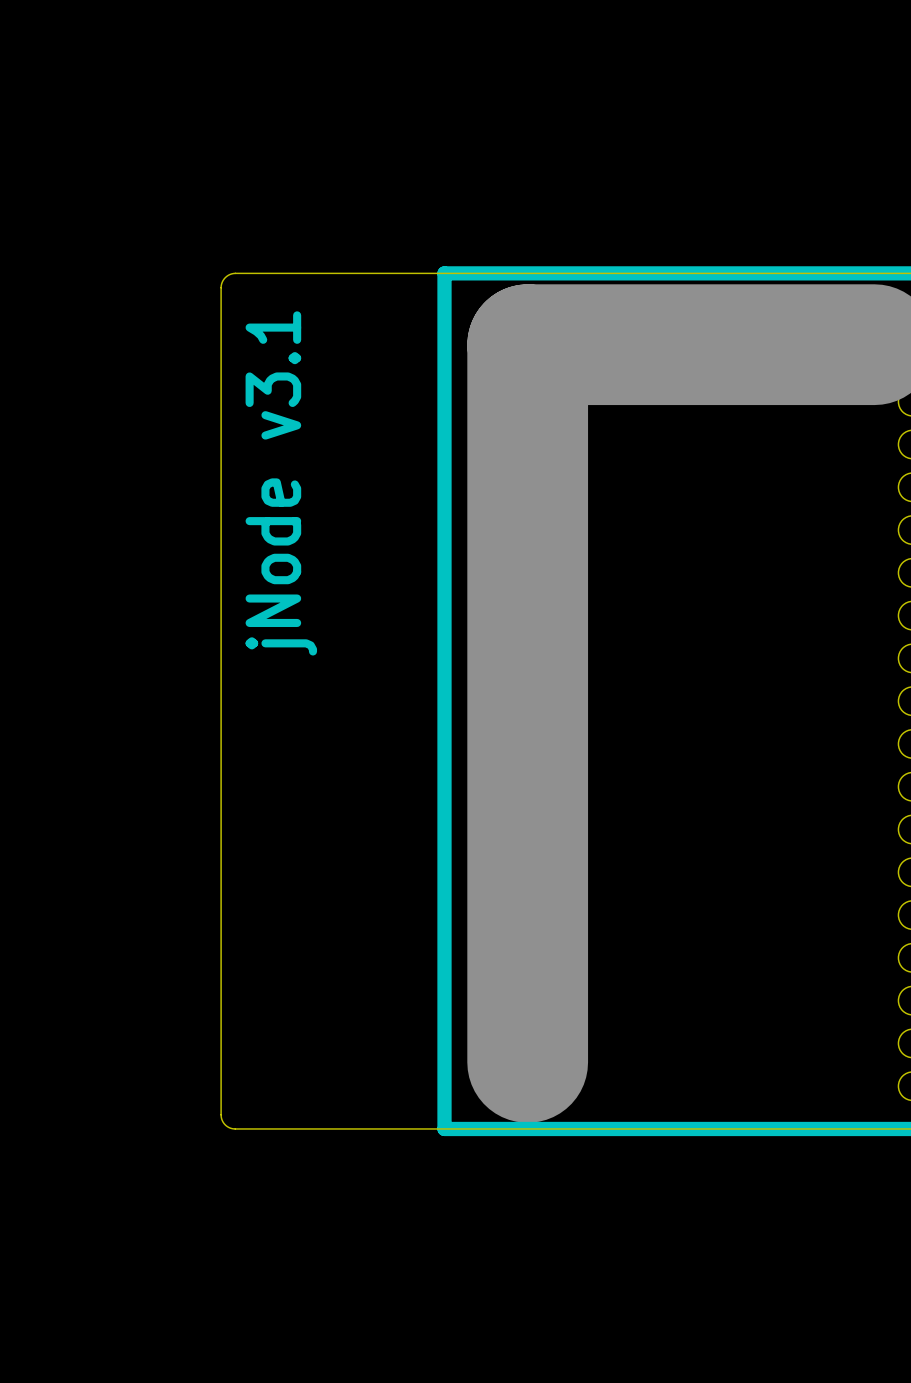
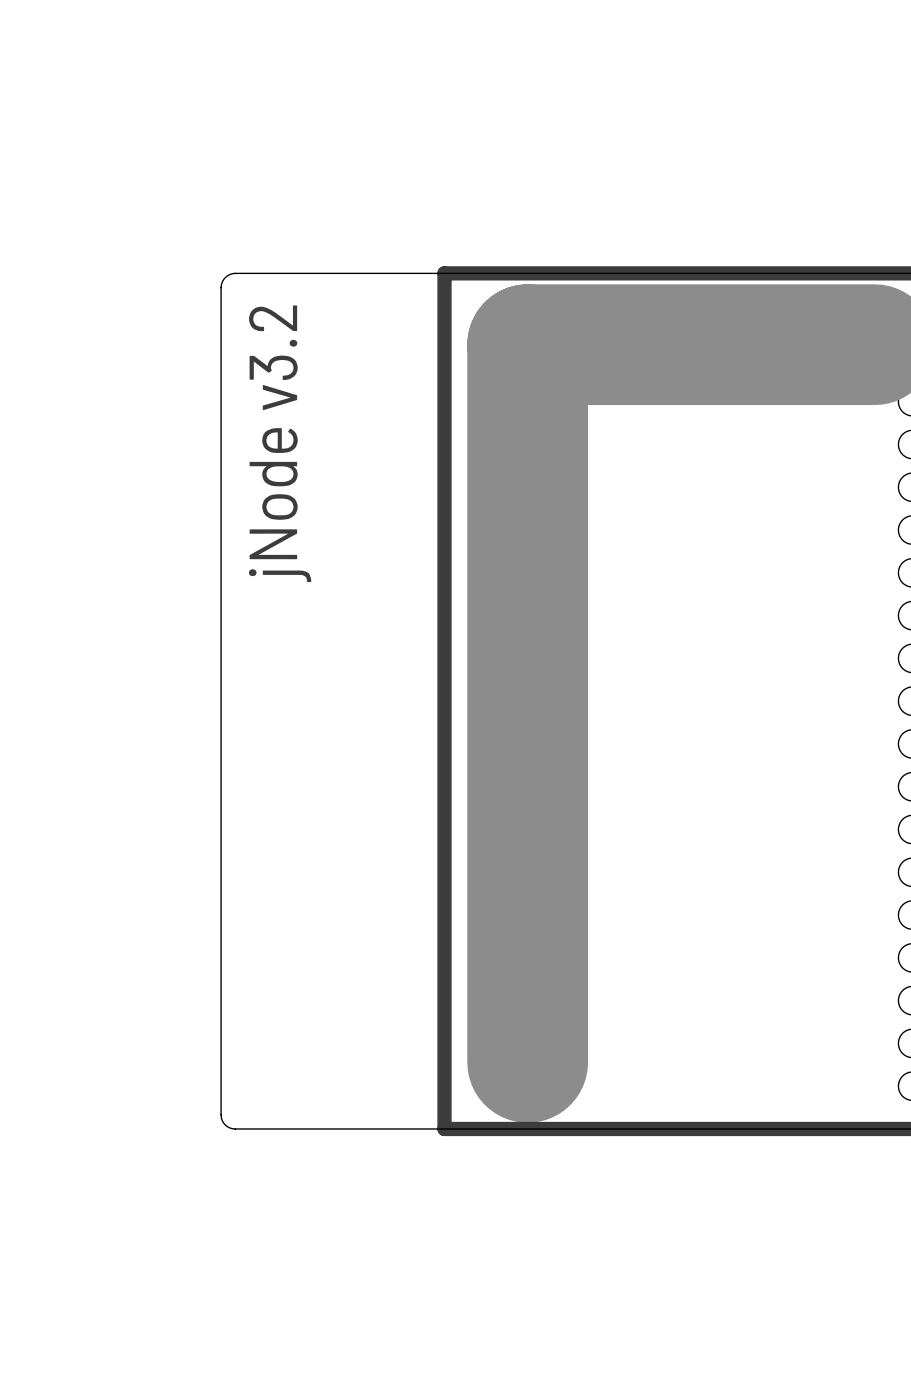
text: jNode v3.1 (281, 483) -> jNode v3.2 (280, 443)

